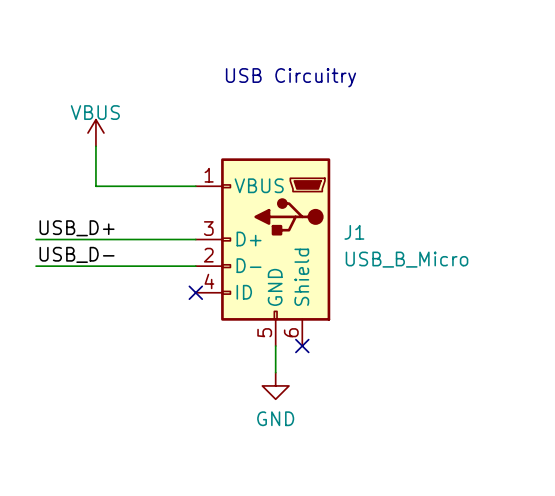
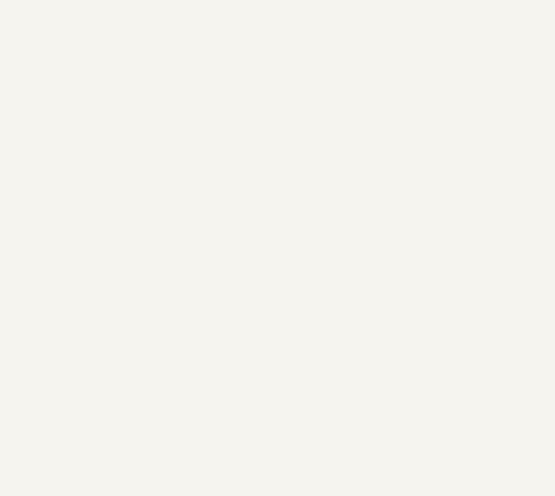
text: USB Circuitry (290, 77) -> none
power symbol: VBUS (95, 133) -> none
wire: (95, 146) (95, 186) (195, 186) -> none
label: USB_D+ (77, 228) -> none
wire: (36, 239) (195, 239) -> none
J1: USB_B_Micro (263, 252) -> none
label: USB_D- (77, 254) -> none
wire: (36, 266) (195, 266) -> none
no-connect mark: (195, 292) -> none
wire: (275, 346) (275, 372) -> none
no-connect mark: (302, 346) -> none
power symbol: GND (275, 385) -> none

